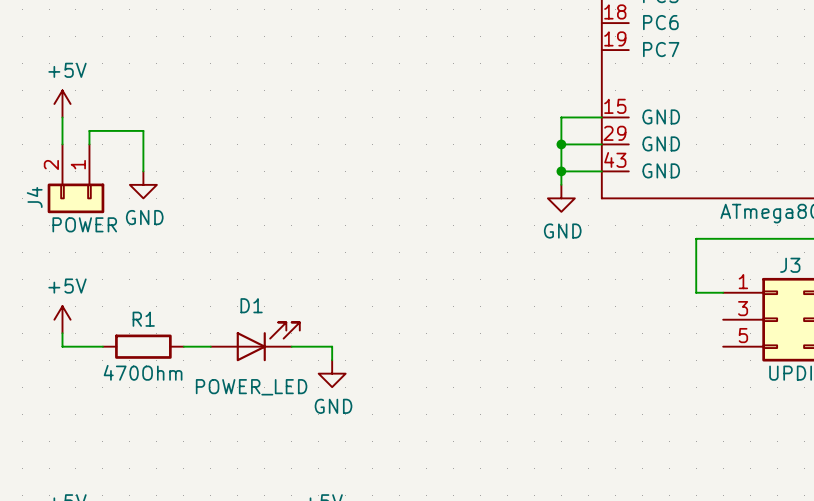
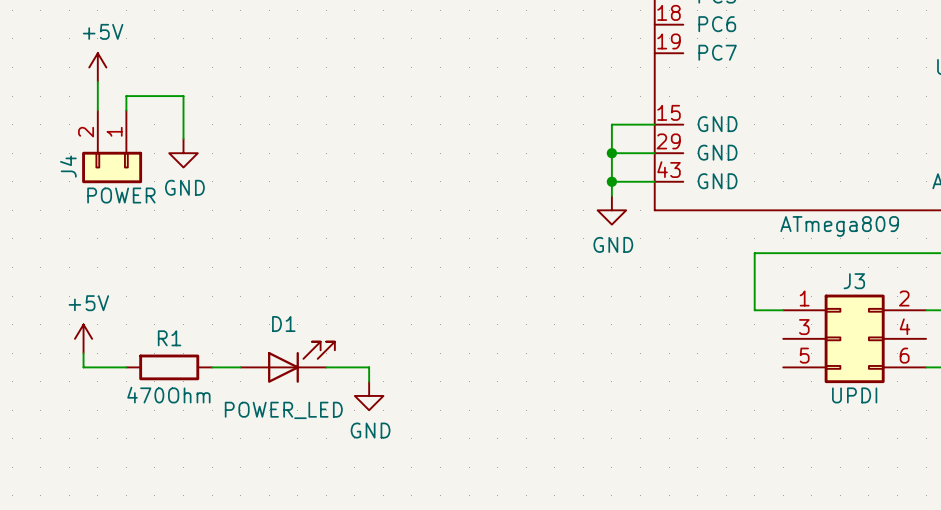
power symbol position: +5V (62, 103) -> +5V (97, 67)
wire: (62, 117) (62, 144) -> (97, 81) (97, 110)
wire: (89, 144) (89, 130) (143, 130) (143, 171) -> (126, 110) (126, 96) (183, 96) (183, 138)
J4 position: (75, 178) -> (112, 146)
power symbol position: GND (143, 184) -> GND (183, 153)

